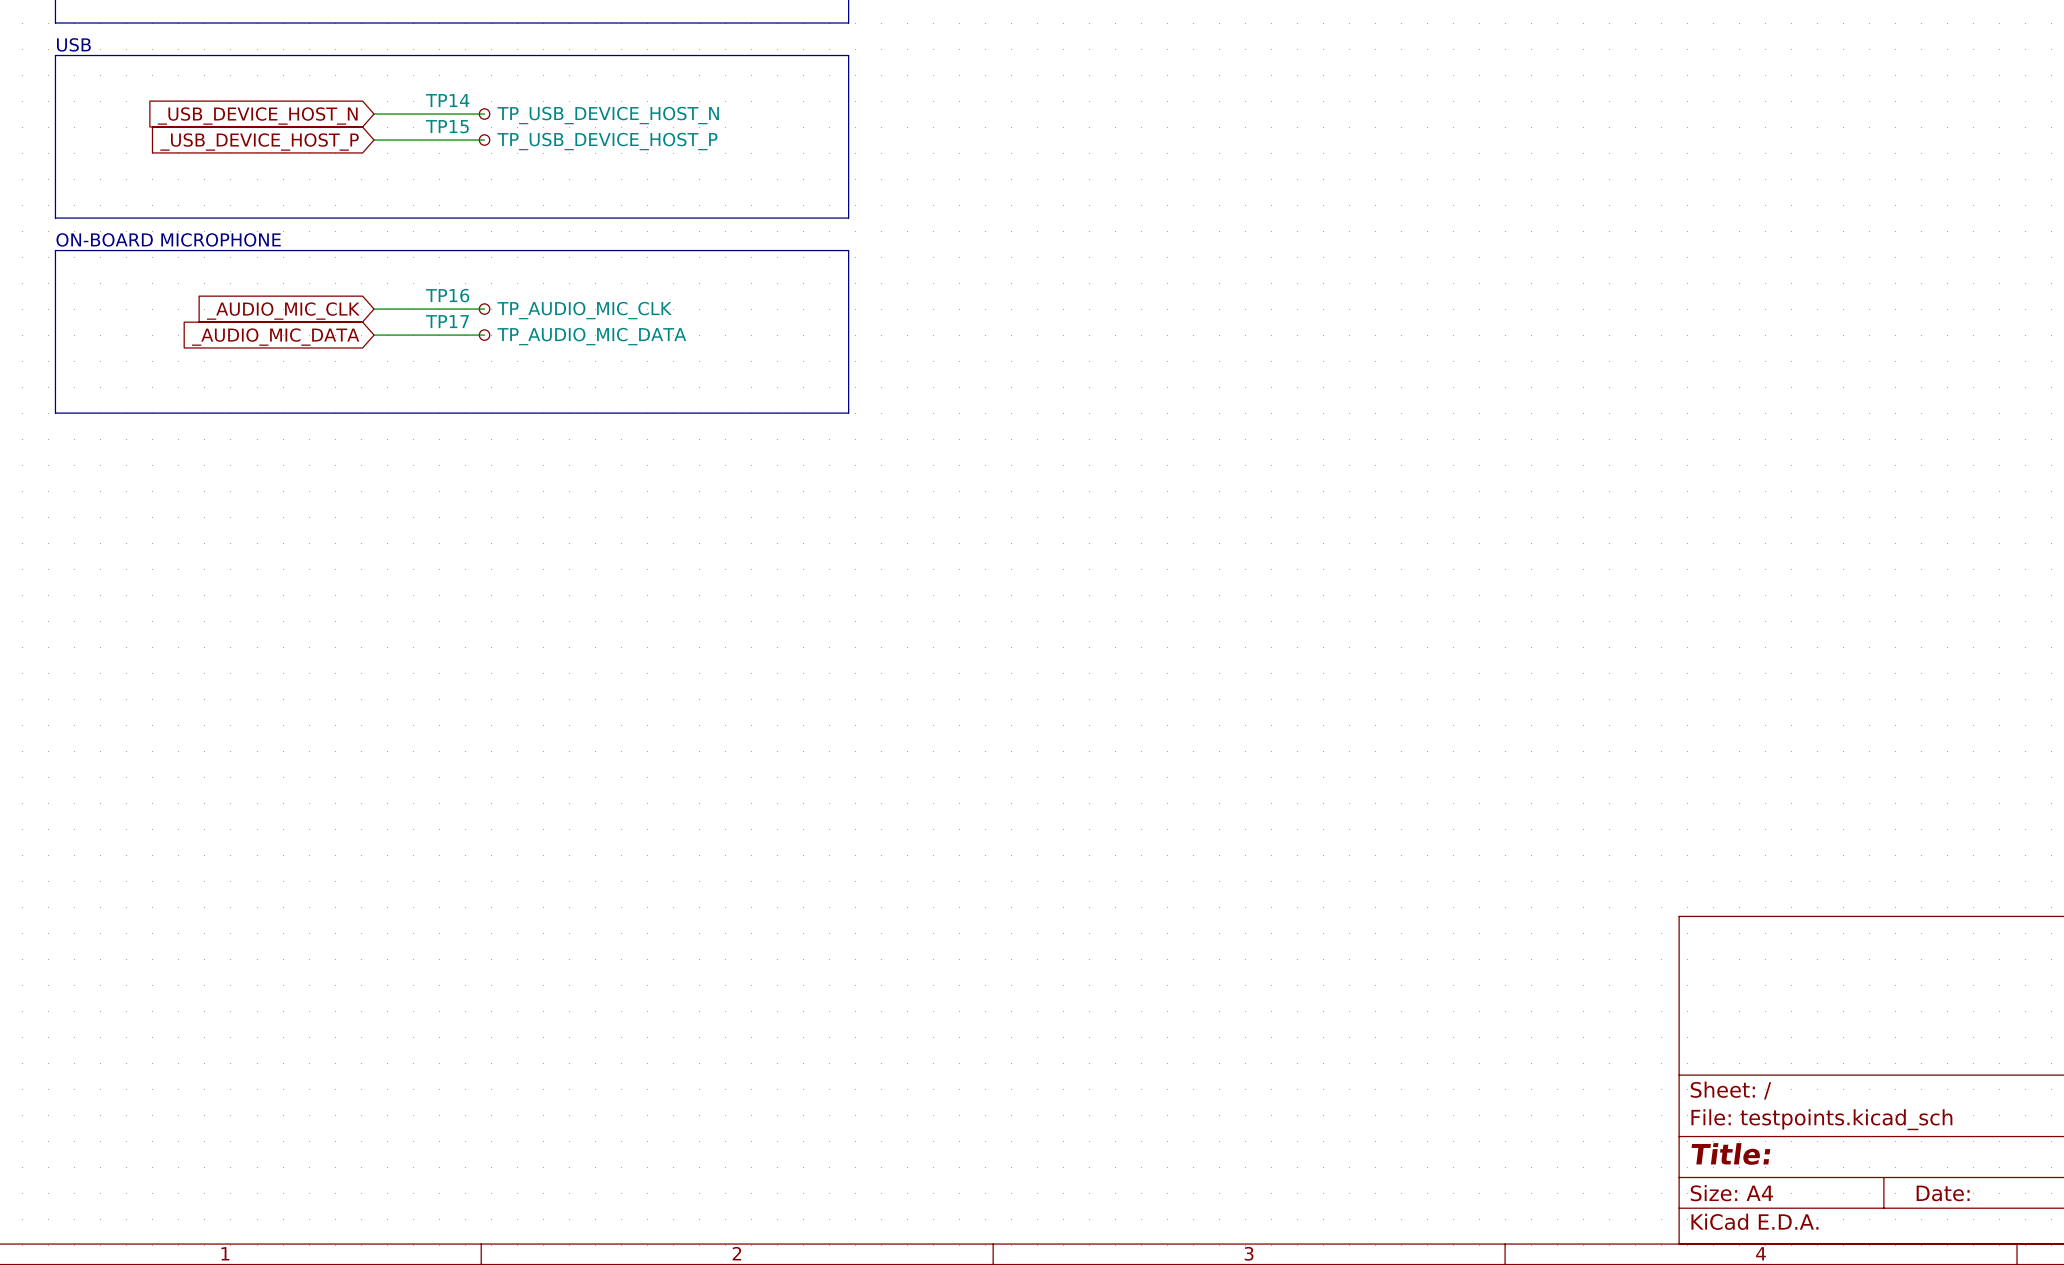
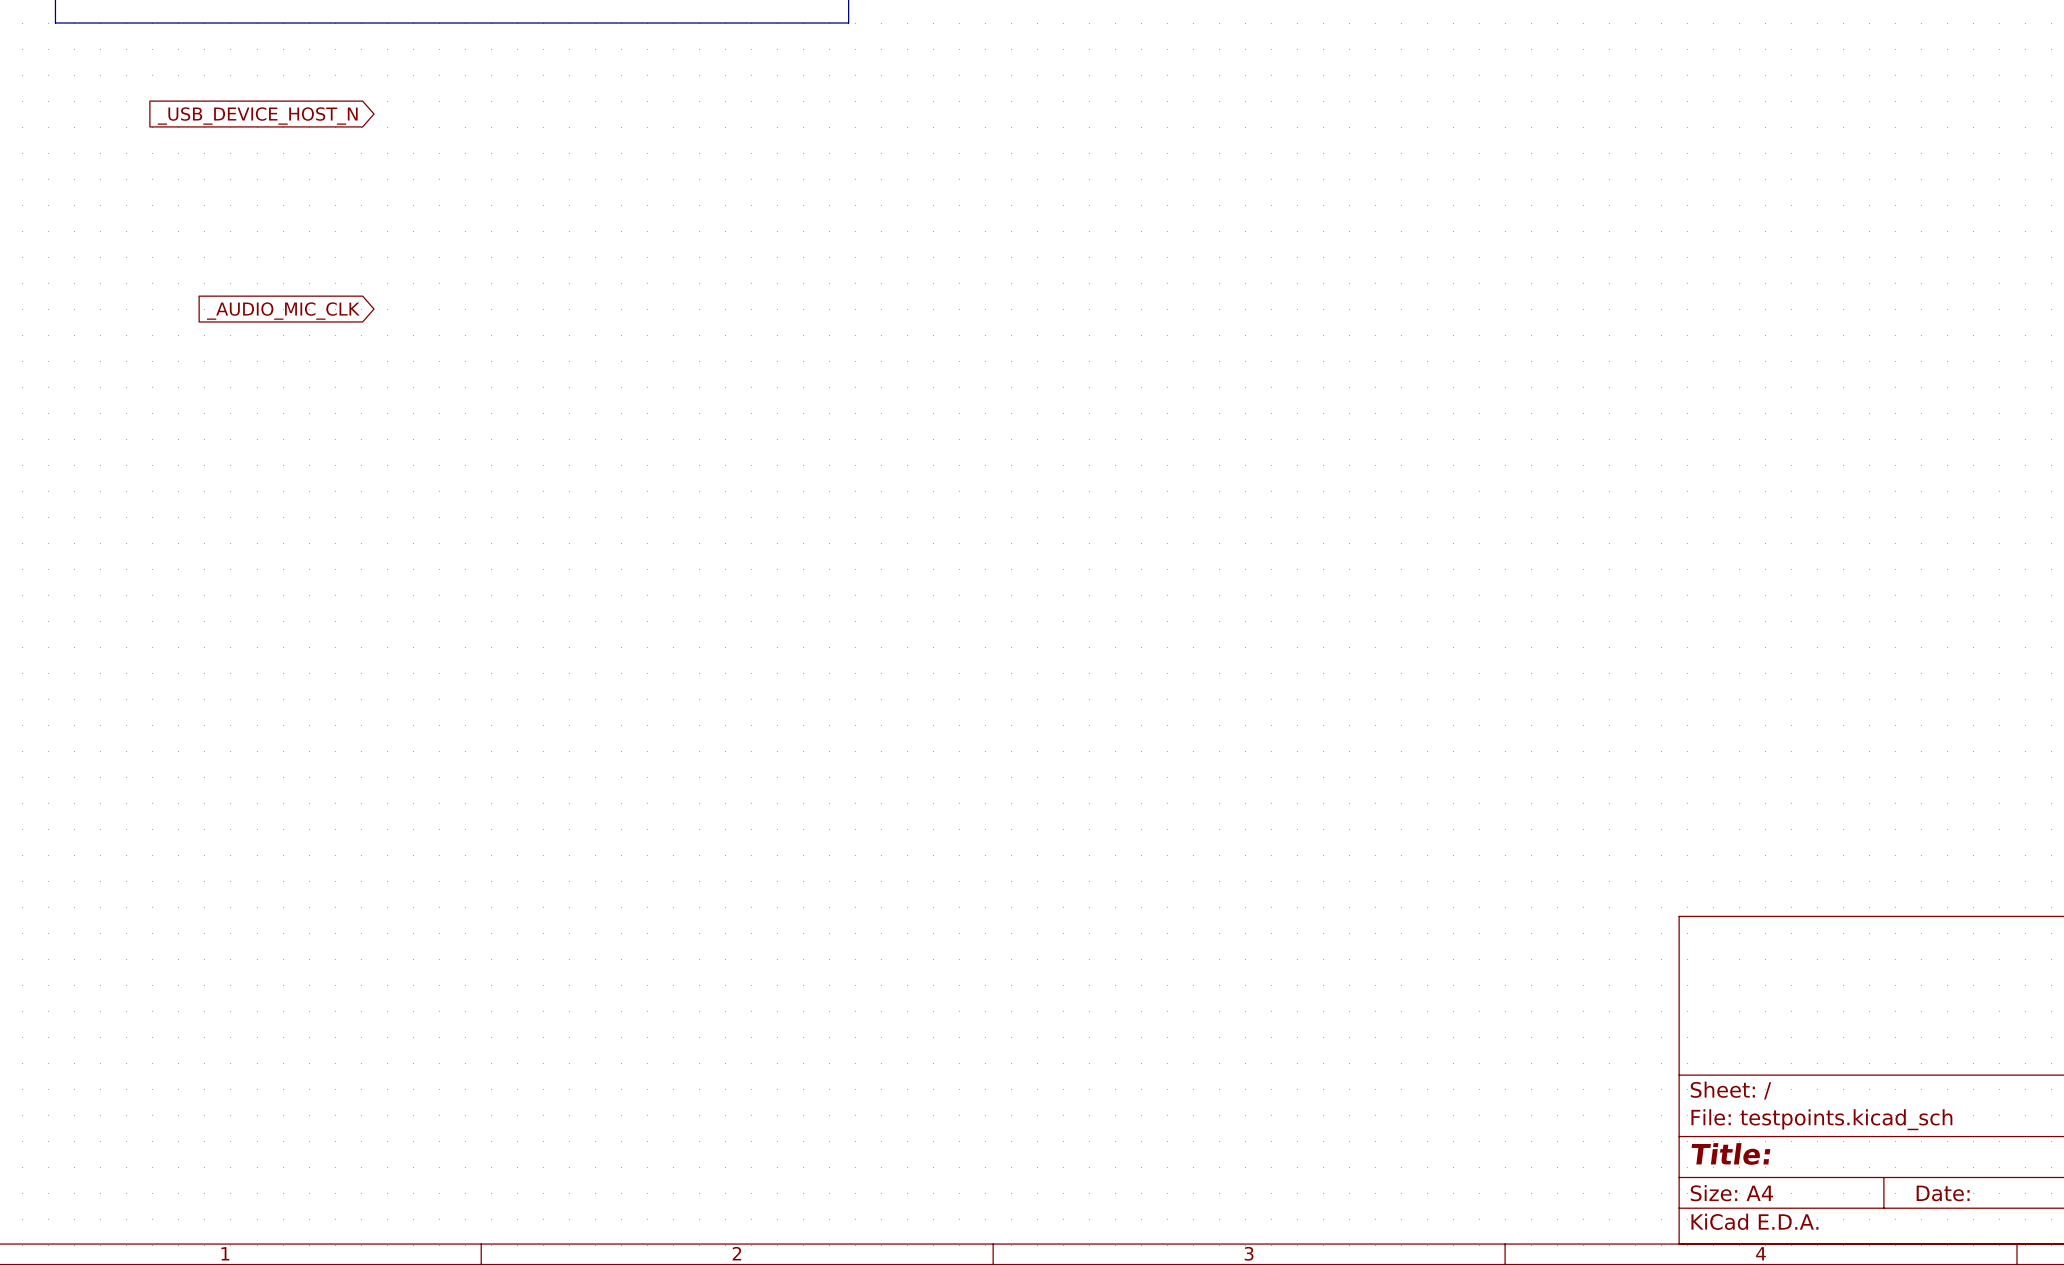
text: USB (73, 44) -> none
line: (55, 55) (55, 218) (848, 218) (848, 55) (55, 55) -> none
wire: (374, 114) (484, 114) -> none
TP14: TP_USB_DEVICE_HOST_N (484, 114) -> none
wire: (374, 140) (484, 140) -> none
TP15: TP_USB_DEVICE_HOST_P (484, 140) -> none
global label: _USB_DEVICE_HOST_P (259, 142) -> none
text: ON-BOARD MICROPHONE (168, 239) -> none
line: (55, 250) (55, 413) (848, 413) (848, 250) (55, 250) -> none
wire: (374, 309) (484, 309) -> none
TP16: TP_AUDIO_MIC_CLK (484, 309) -> none
wire: (374, 335) (484, 335) -> none
TP17: TP_AUDIO_MIC_DATA (484, 335) -> none
global label: _AUDIO_MIC_DATA (275, 337) -> none

